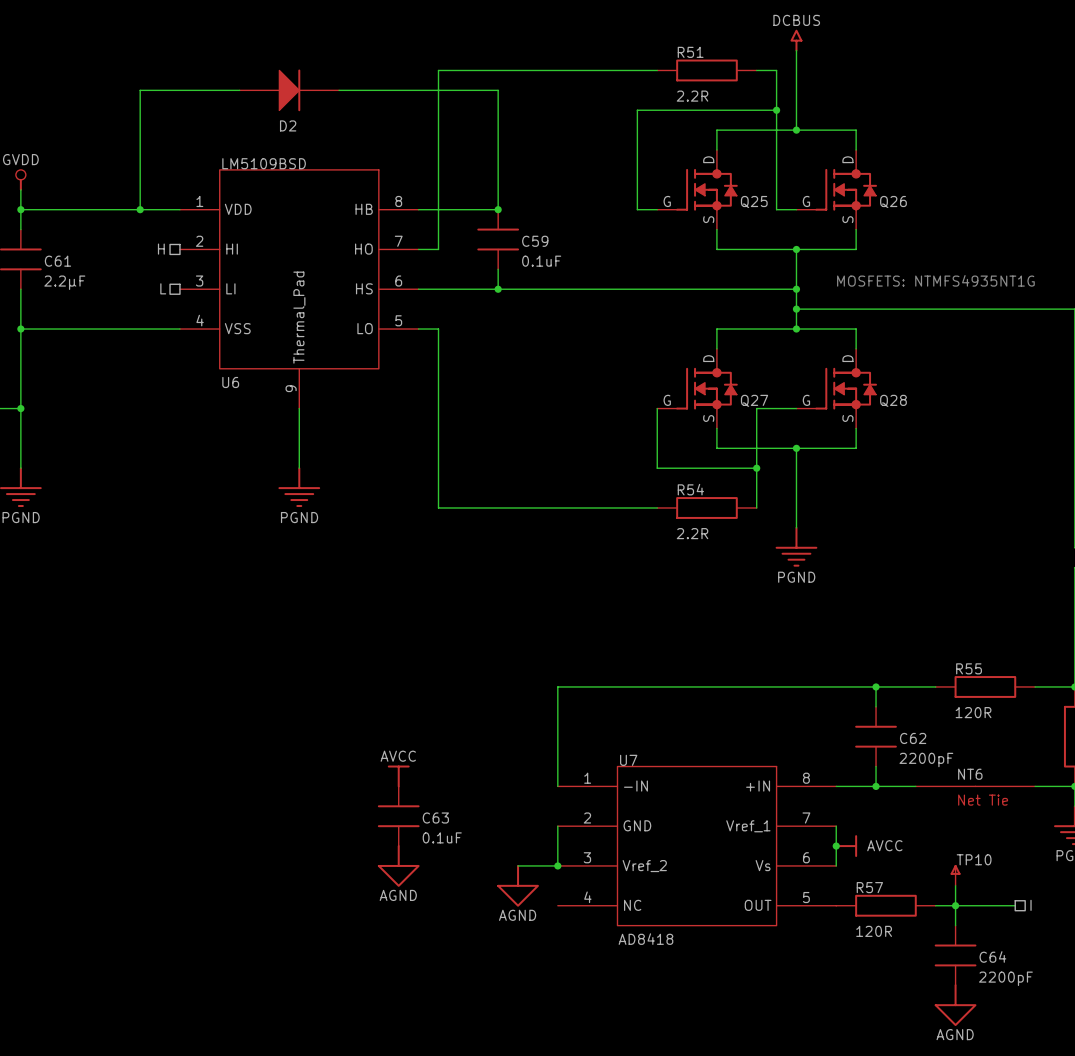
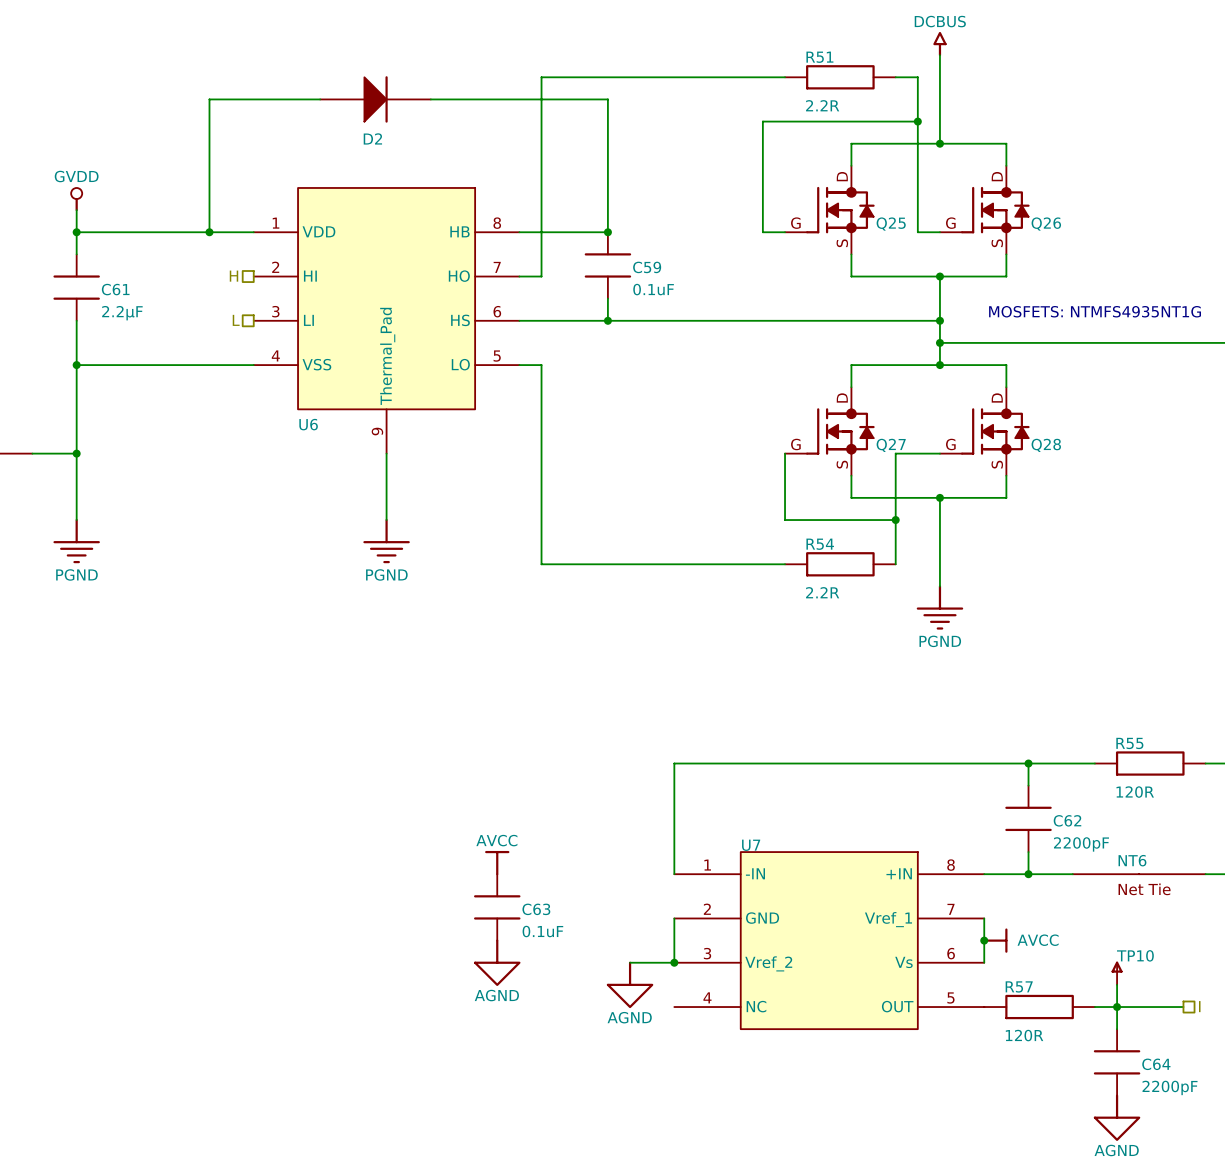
U6 value: LM5109BSD (264, 163) -> none
U7 value: AD8418 (645, 939) -> none

